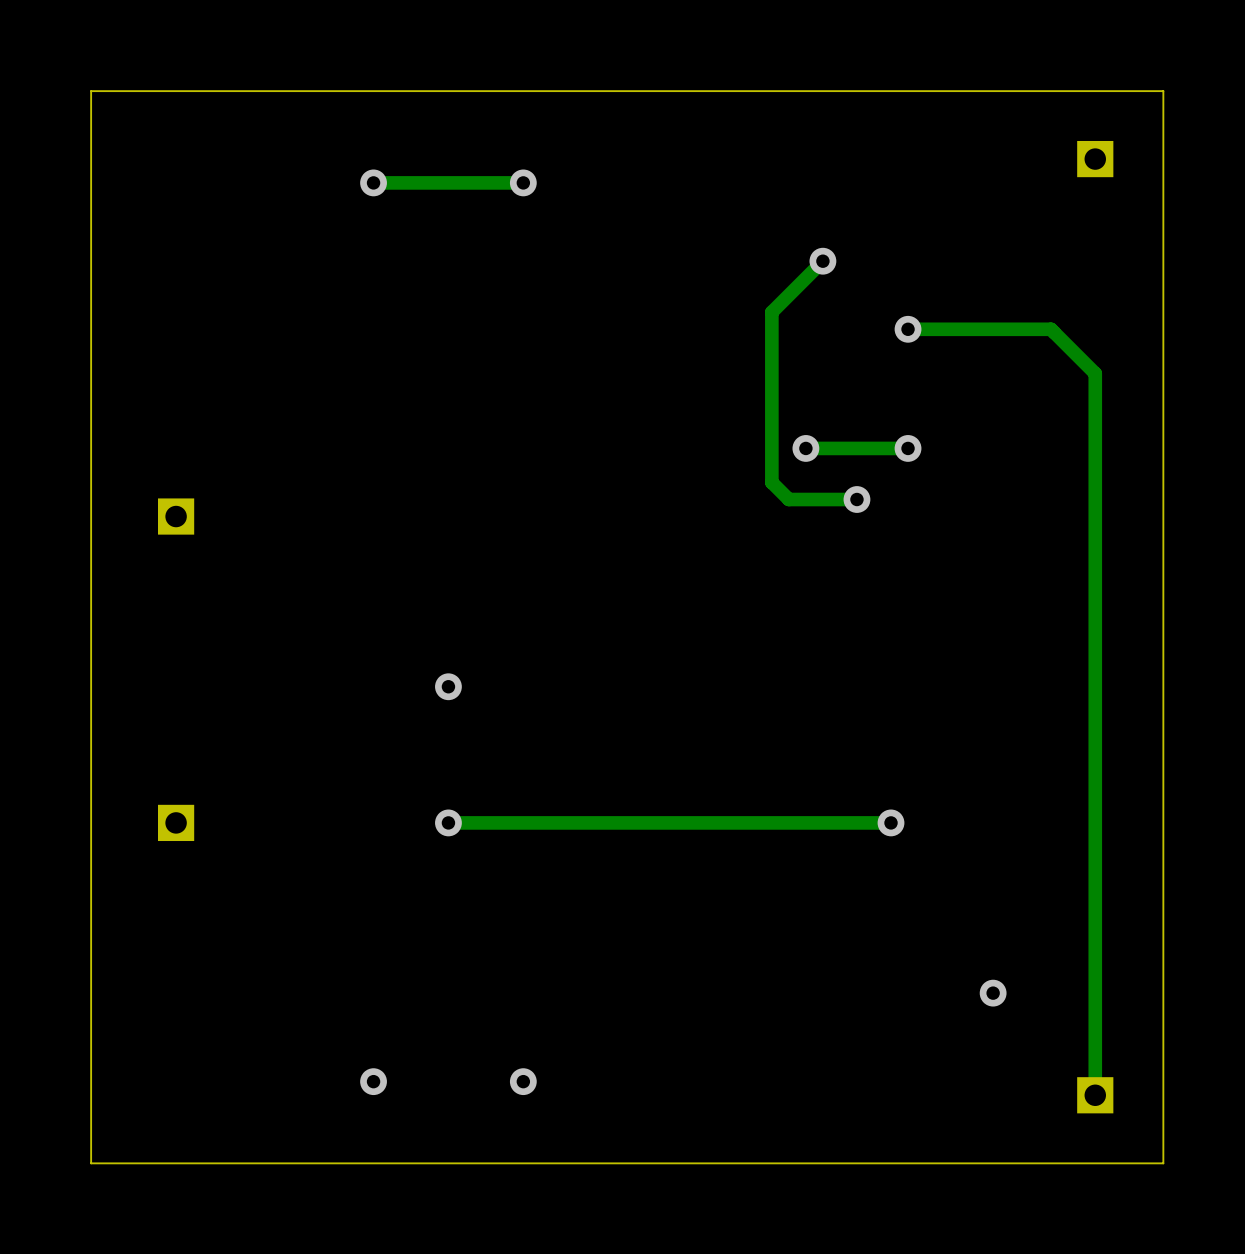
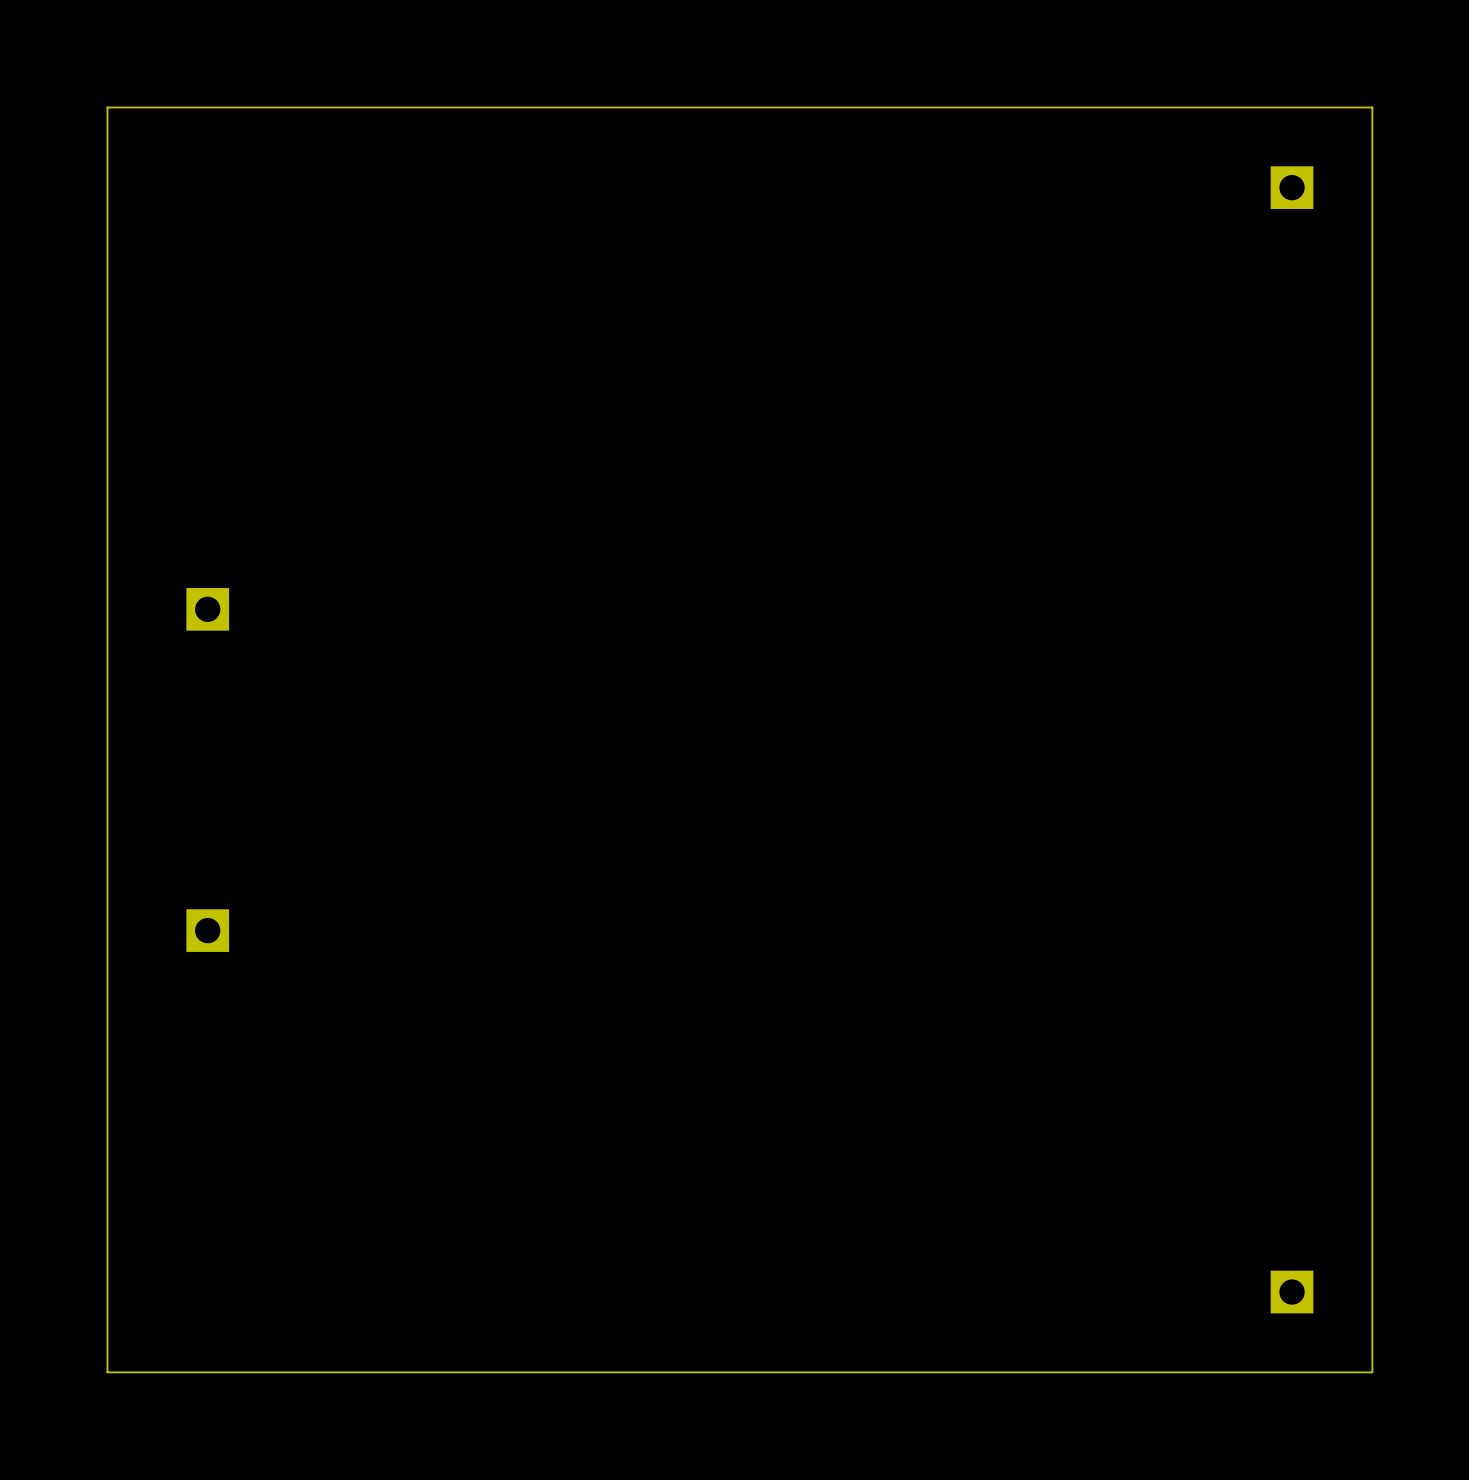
via: (373, 182) -> none
track: (523, 182) (373, 182) -> none
via: (523, 182) -> none
track: (822, 261) (771, 312) (771, 482) (788, 499) (856, 499) -> none
via: (822, 261) -> none
track: (908, 329) (1051, 329) (1095, 373) (1095, 1095) -> none
via: (908, 329) -> none
via: (805, 448) -> none
track: (908, 448) (805, 448) -> none
via: (908, 448) -> none
via: (856, 499) -> none
via: (448, 686) -> none
part position: (176, 822) -> (207, 930)
via: (448, 822) -> none
track: (891, 822) (448, 822) -> none
via: (891, 822) -> none
via: (993, 993) -> none
via: (373, 1081) -> none
via: (523, 1081) -> none

